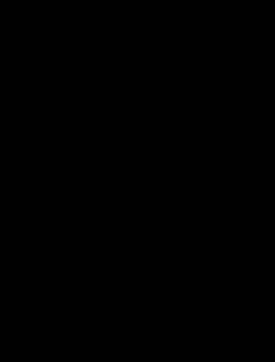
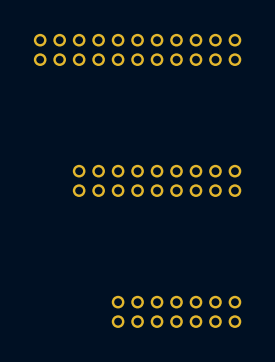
part: none -> (137, 49)
part: none -> (157, 180)
part: none -> (176, 311)

